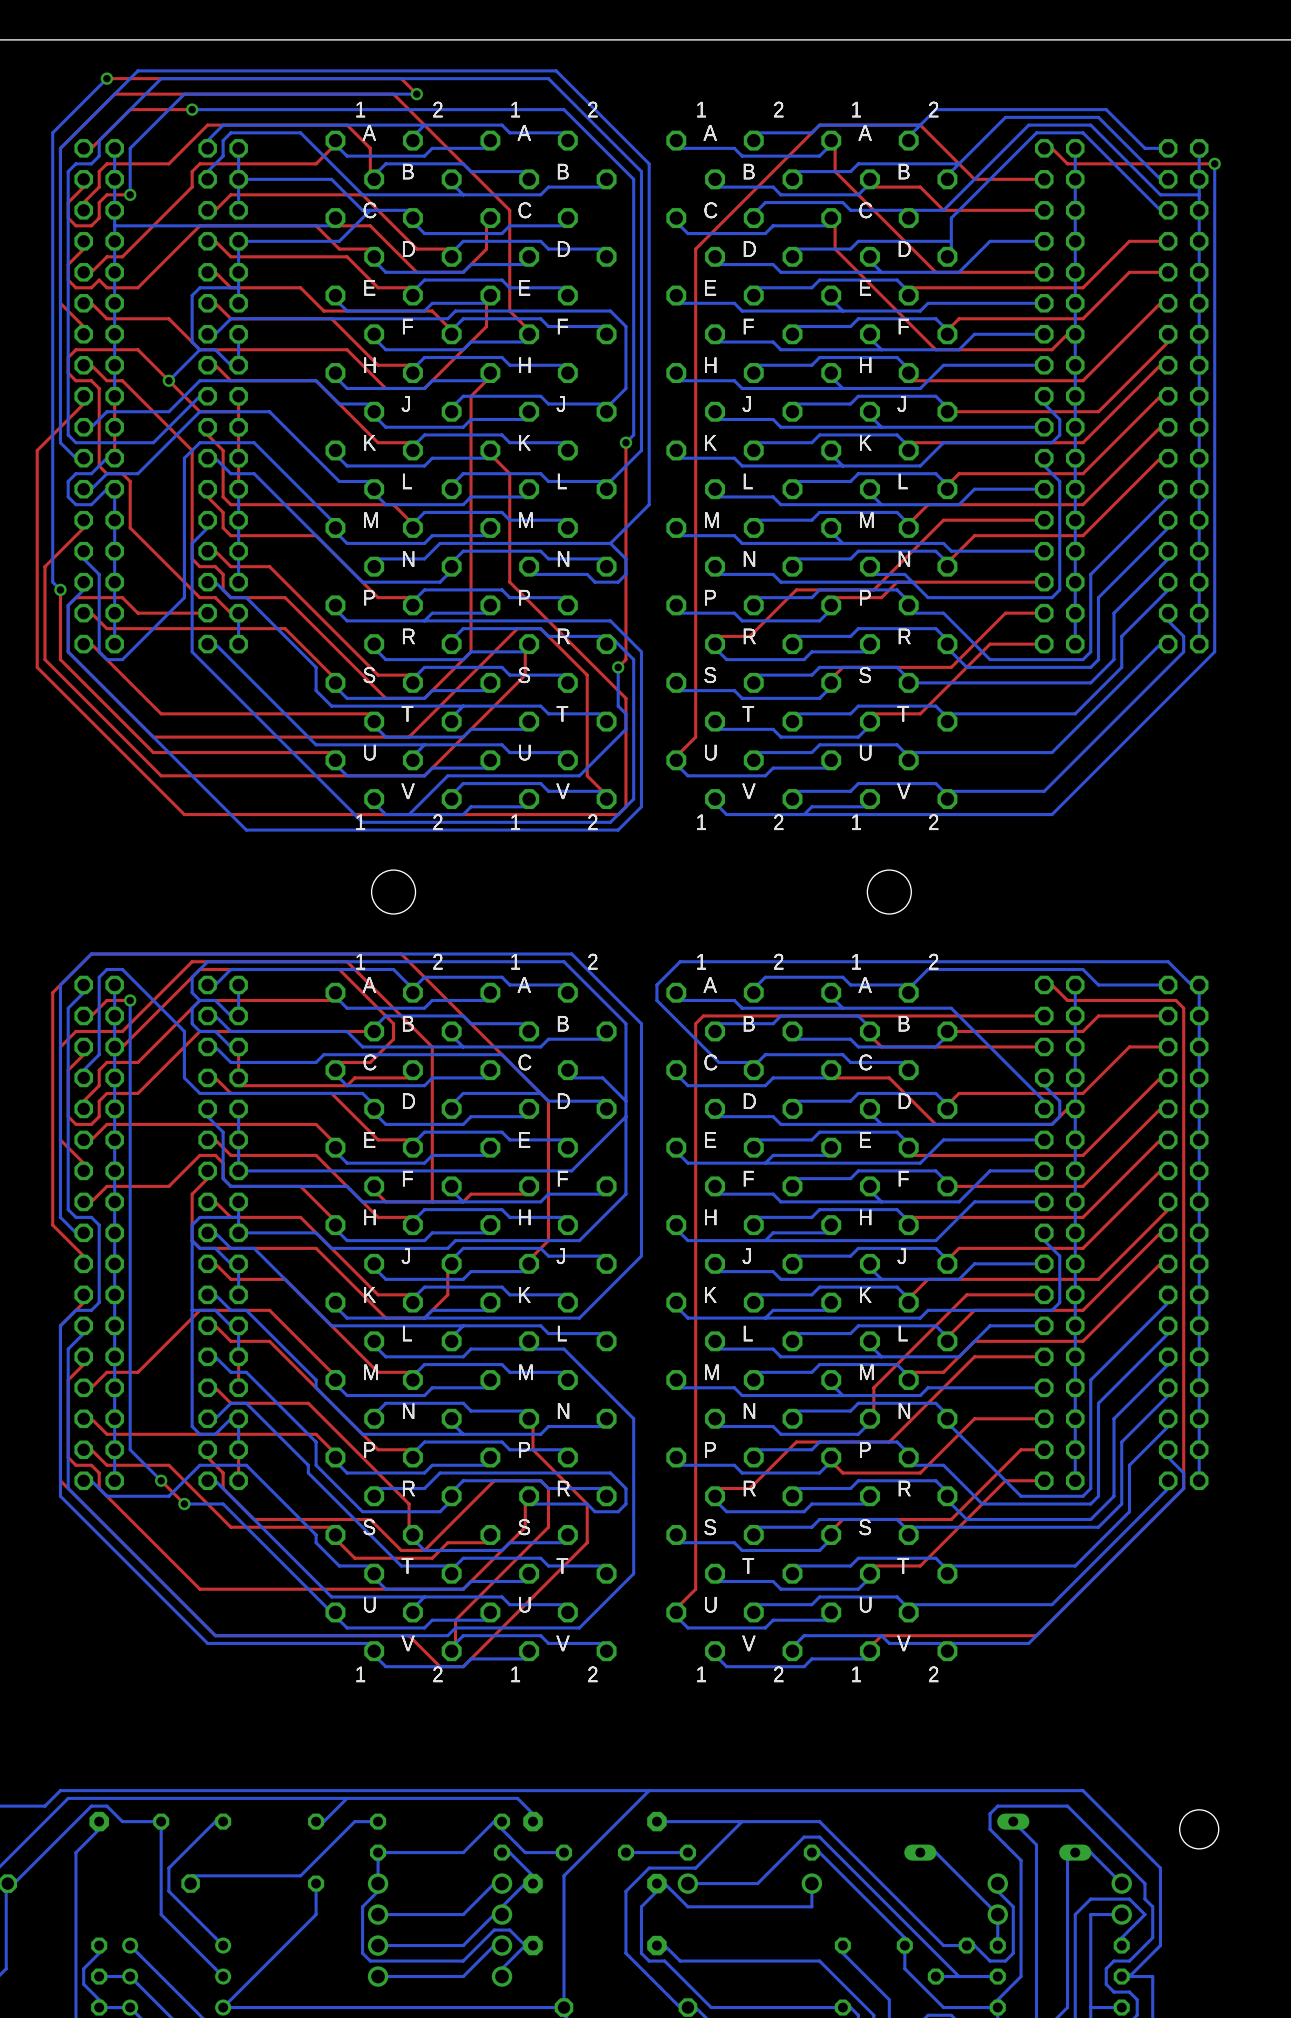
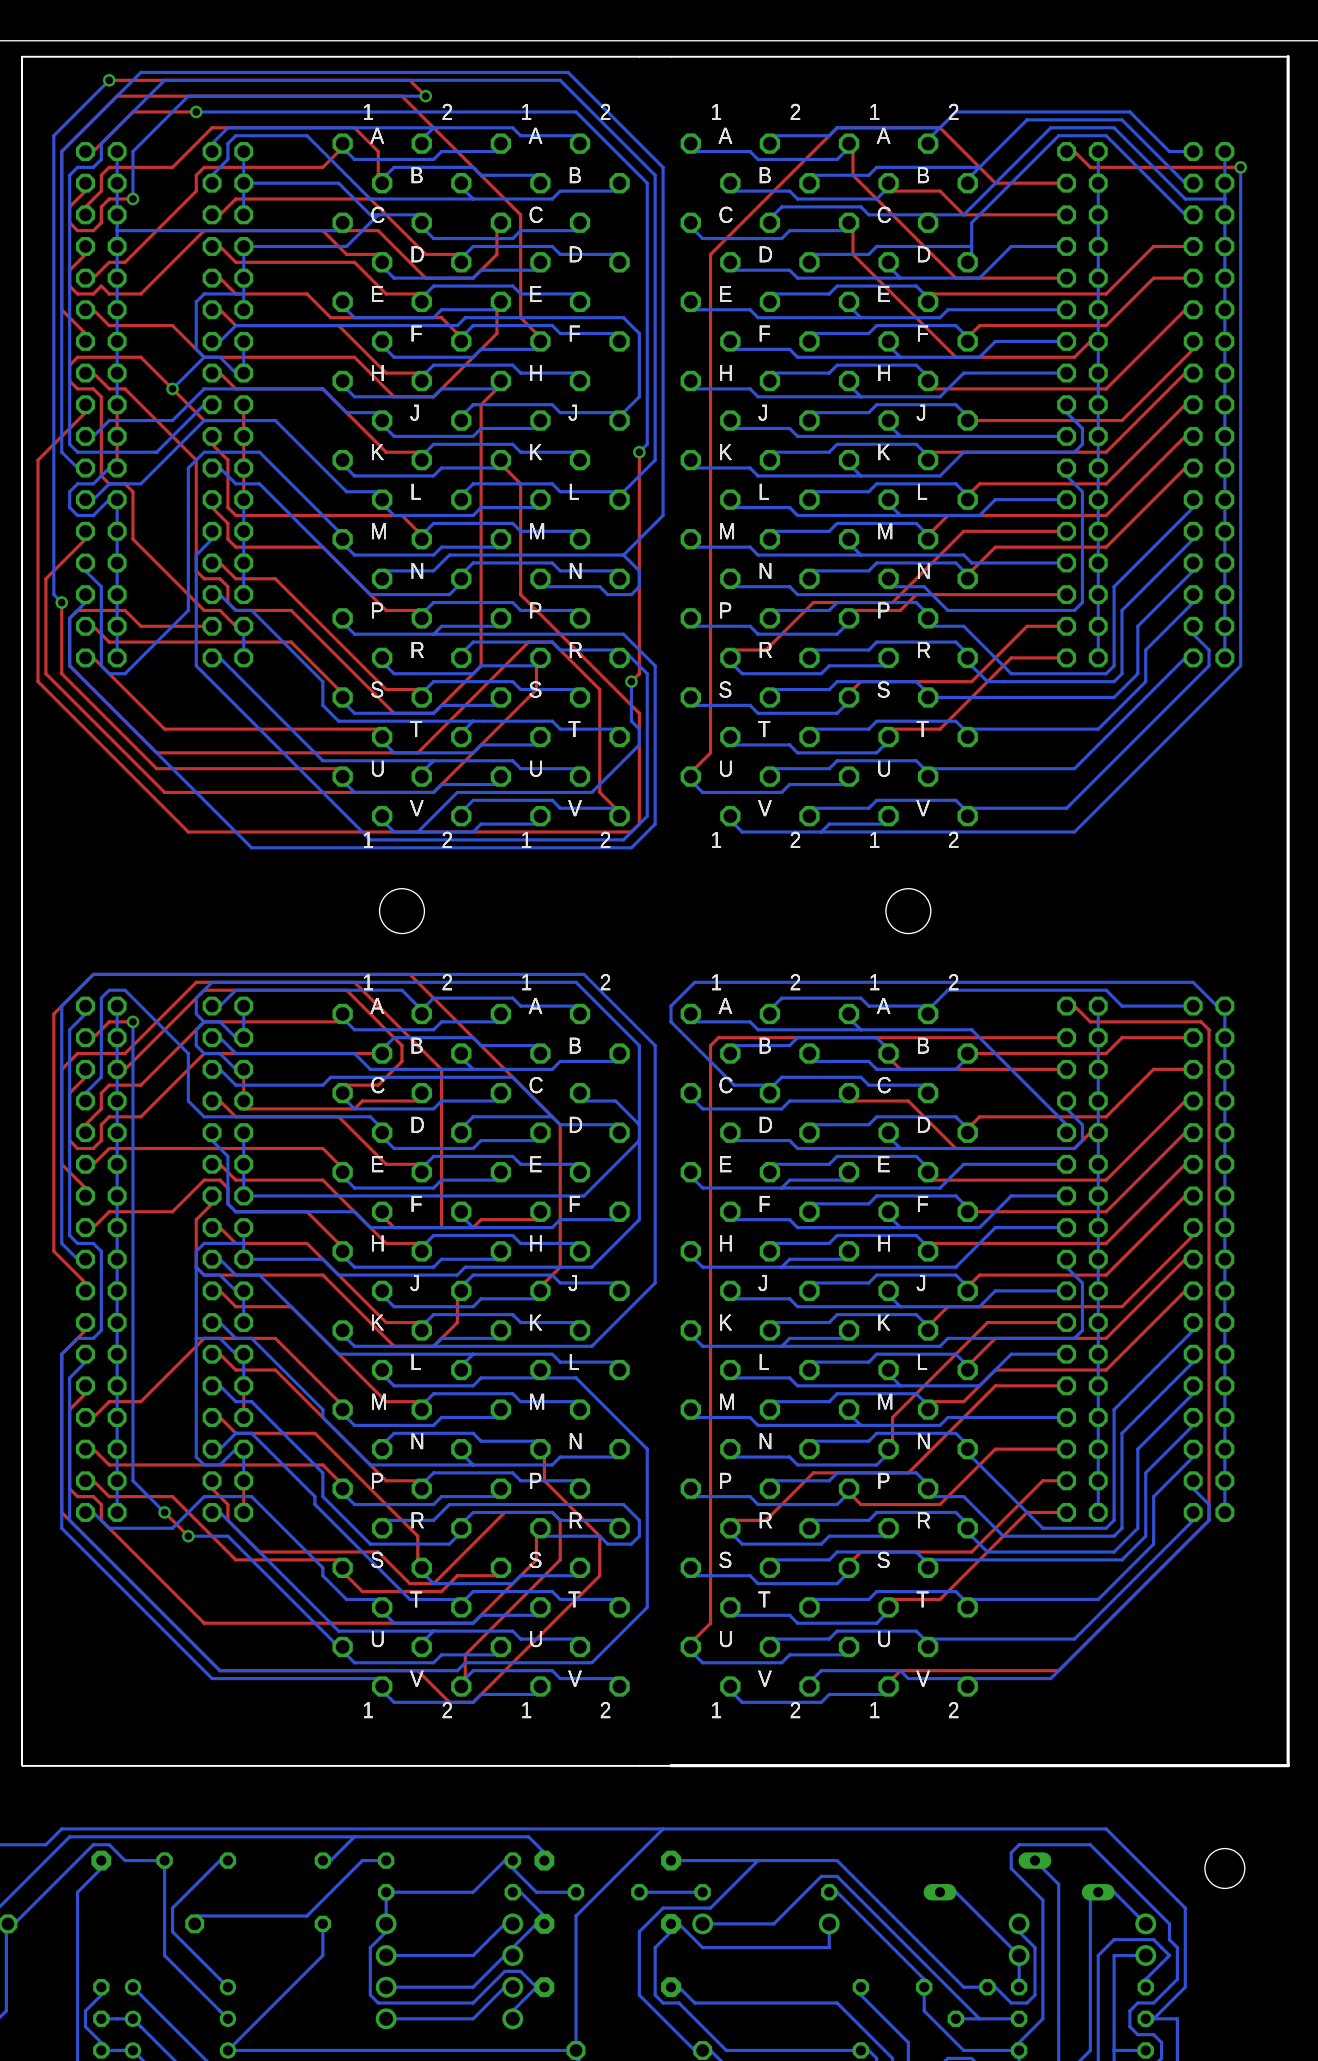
board edge: none -> (1288, 56) (22, 56) (22, 1765) (1288, 1765)
board edge: none -> (1288, 56) (1288, 1765)
board edge: none -> (1288, 1765) (671, 1765)

